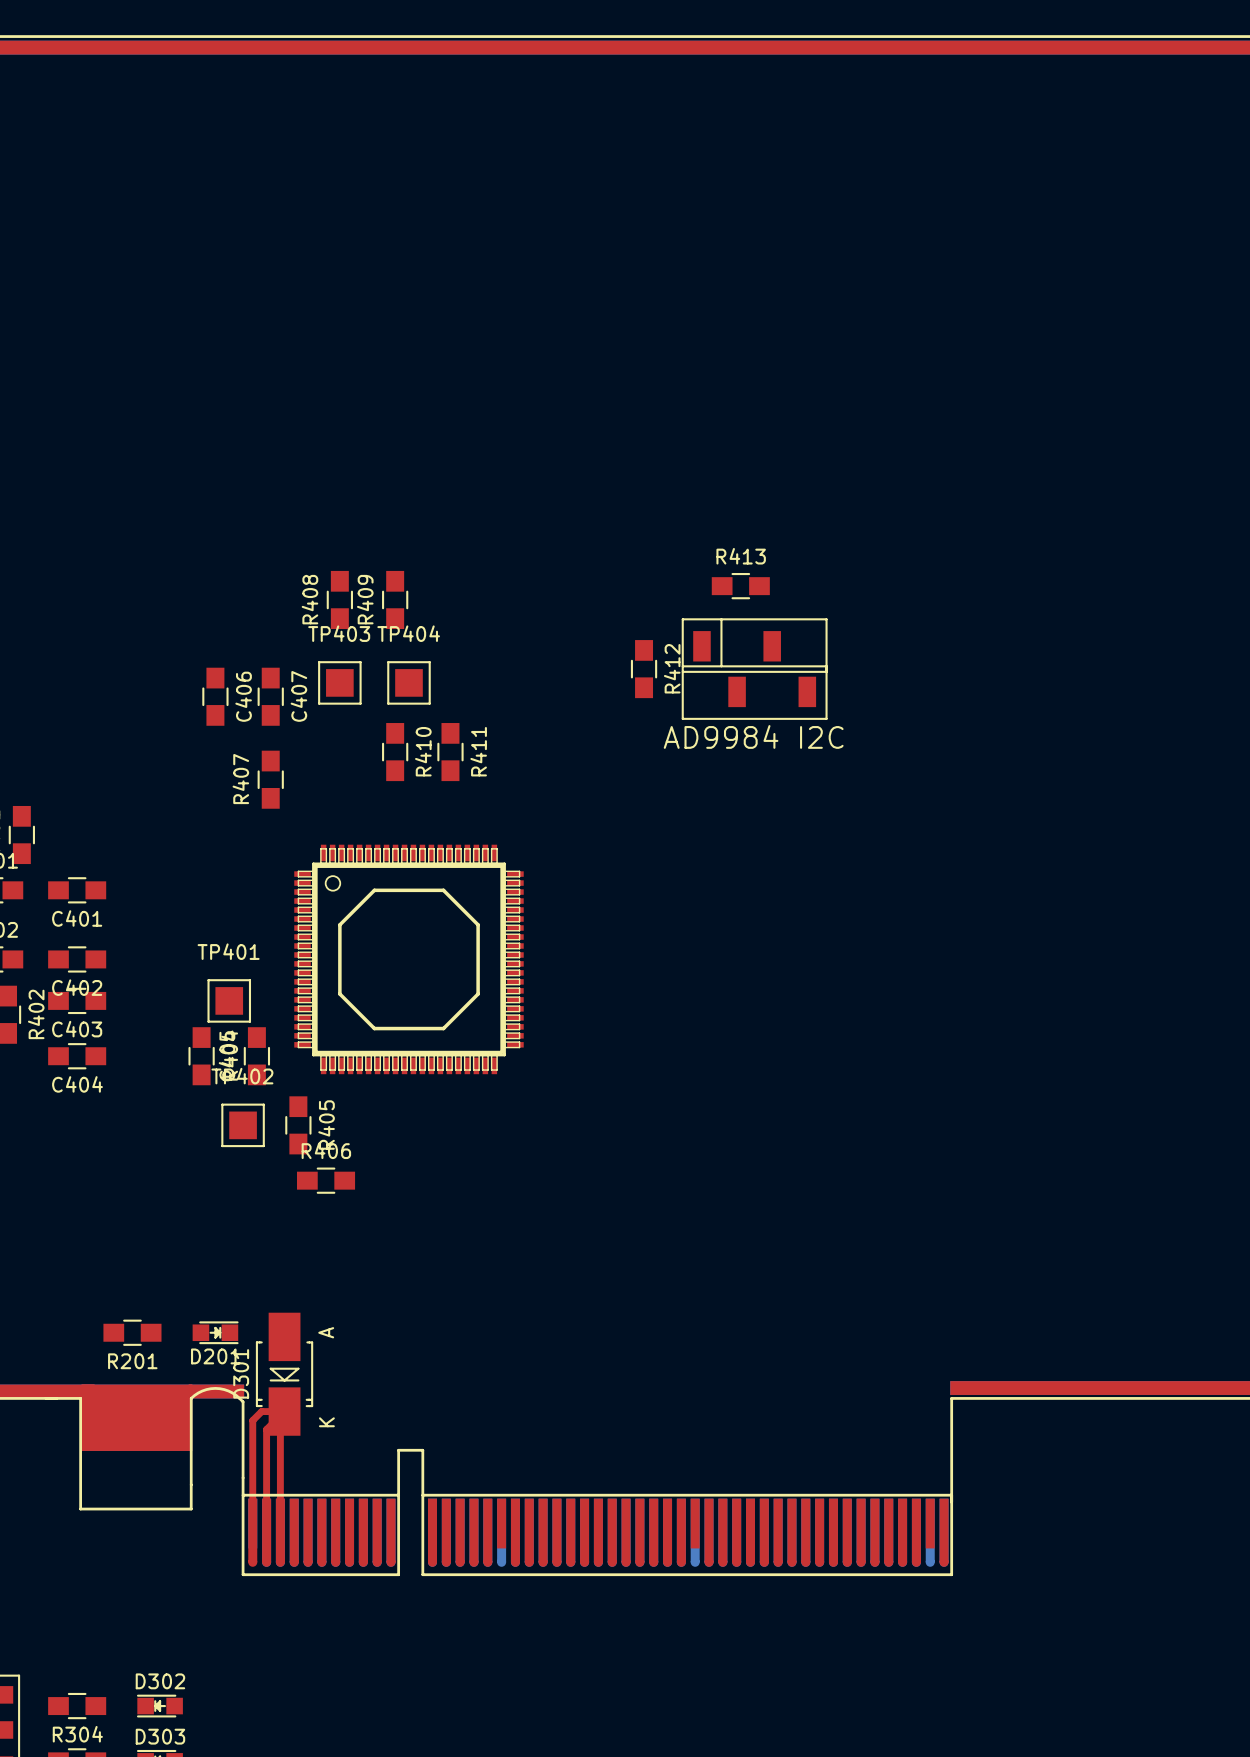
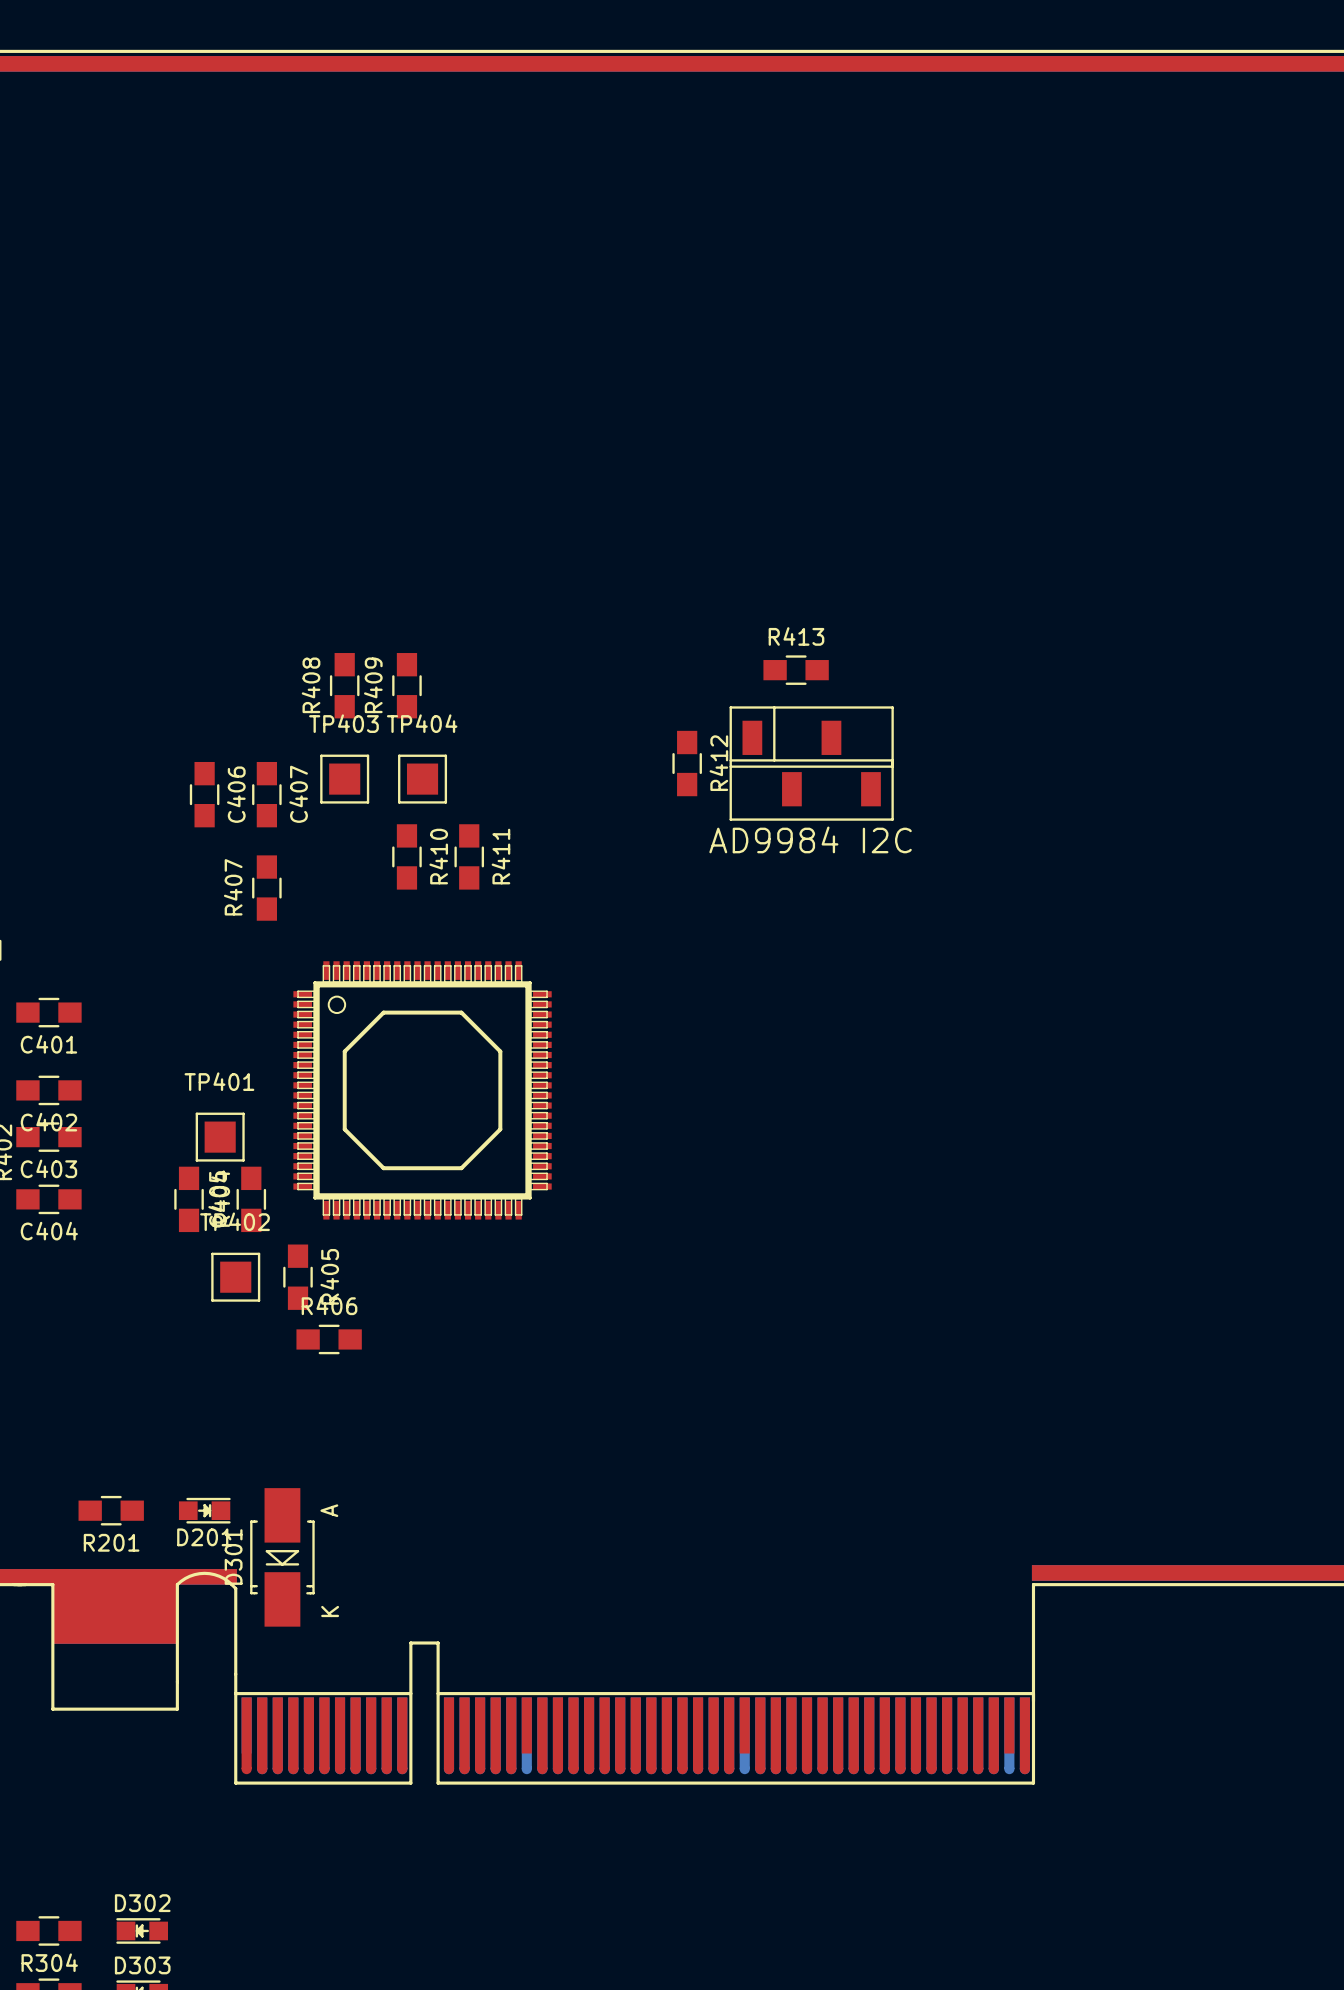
top track: (280, 1415) (280, 1530) -> none
top track: (252, 1530) (252, 1420) (261, 1411) (284, 1411) (266, 1429) (266, 1530) -> none

